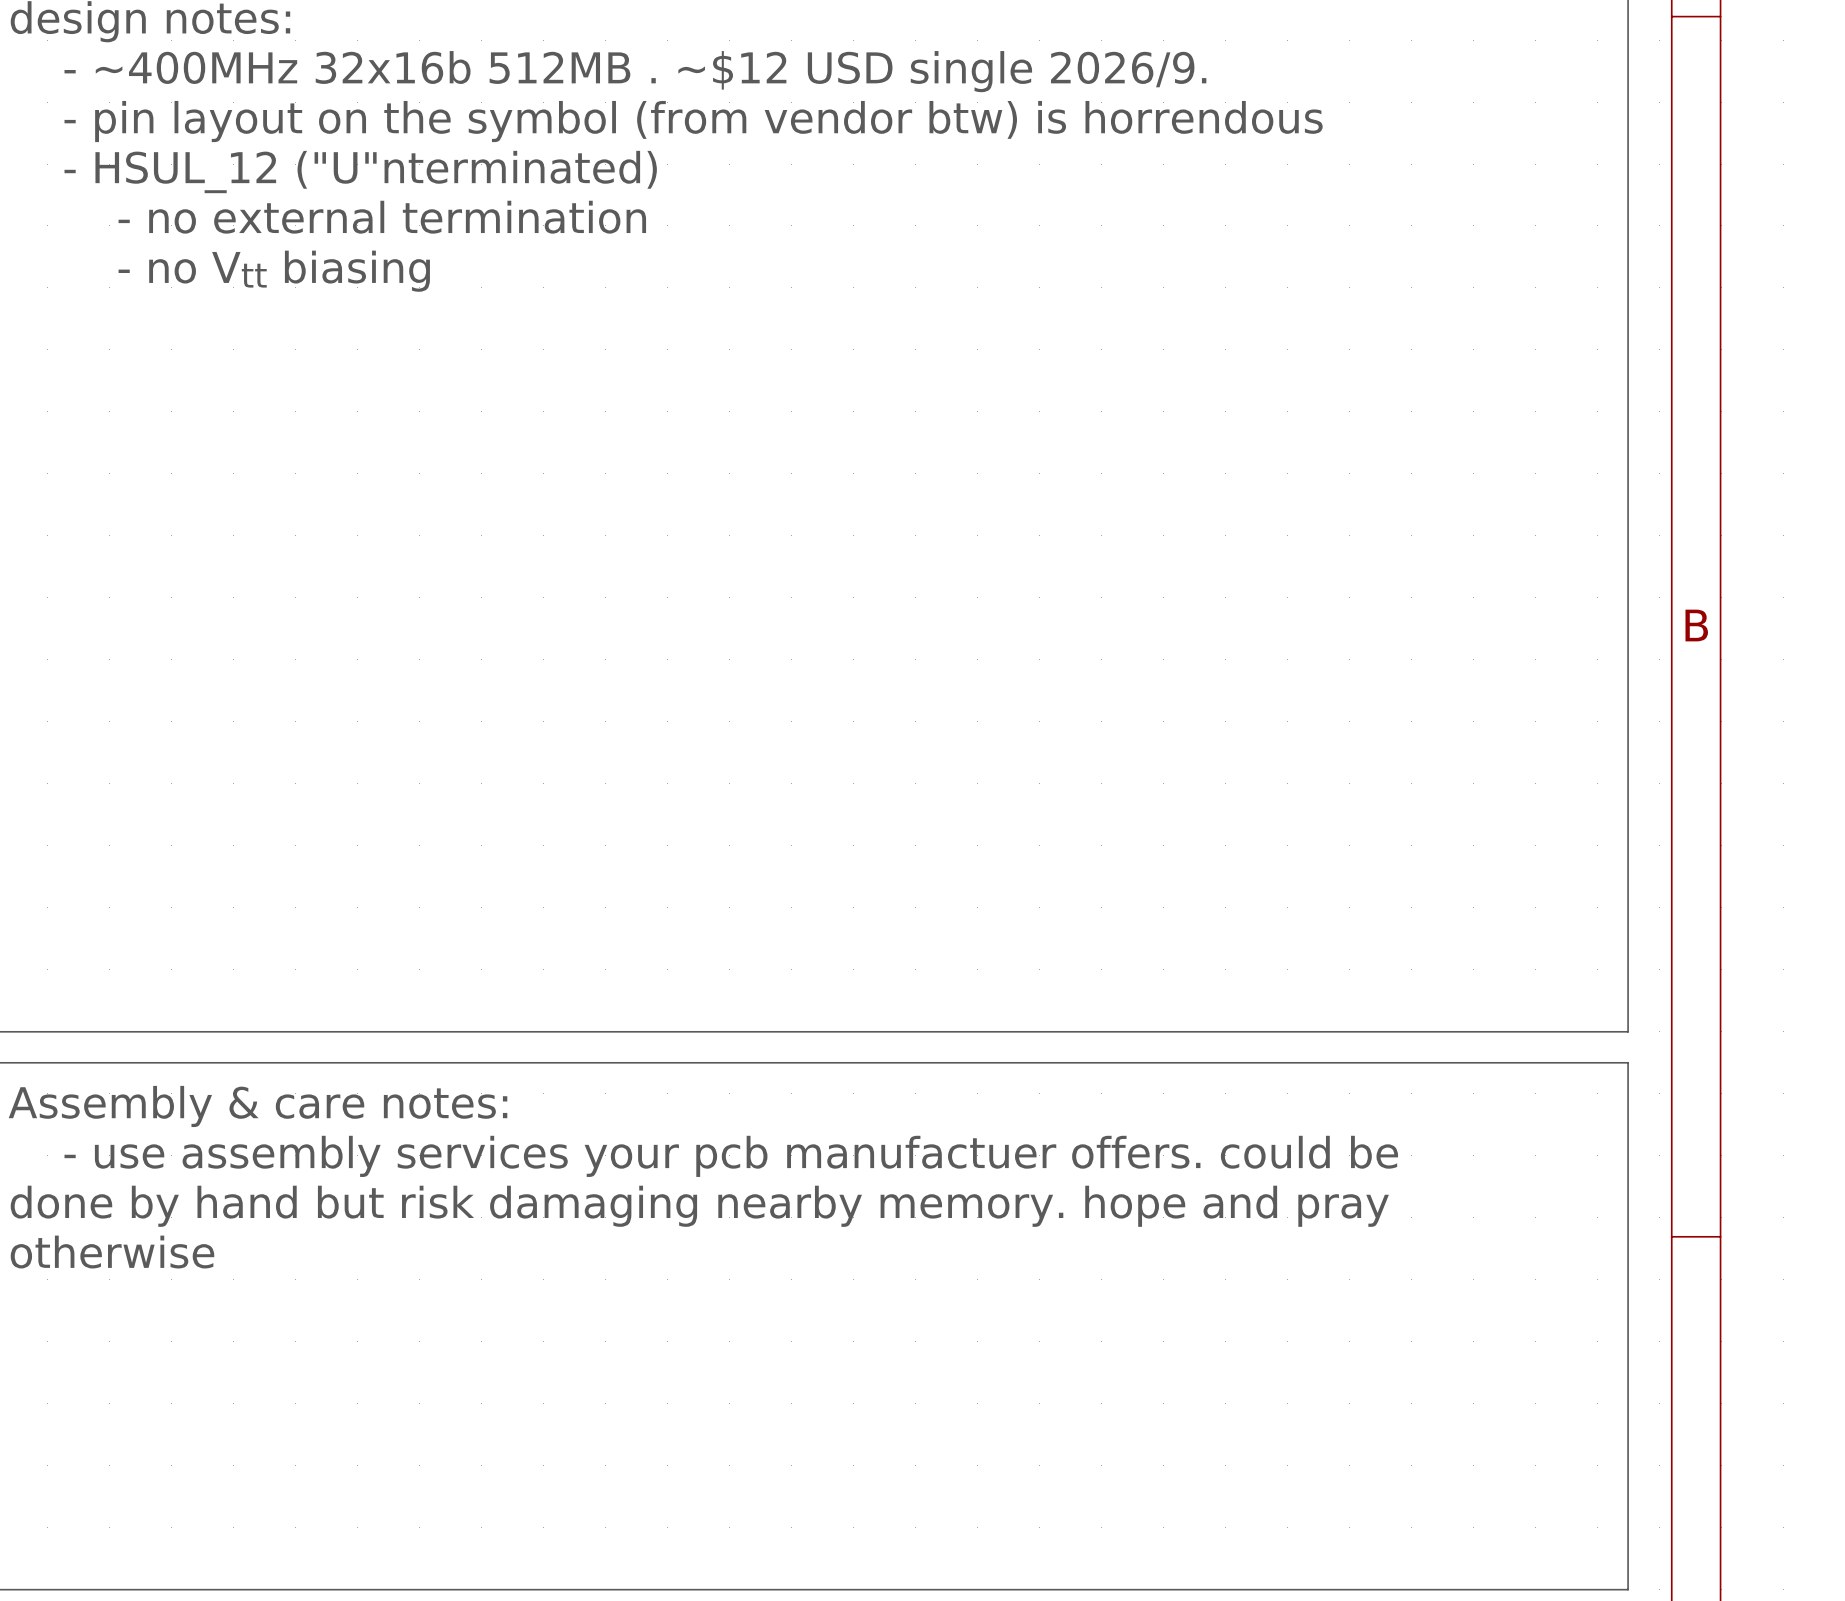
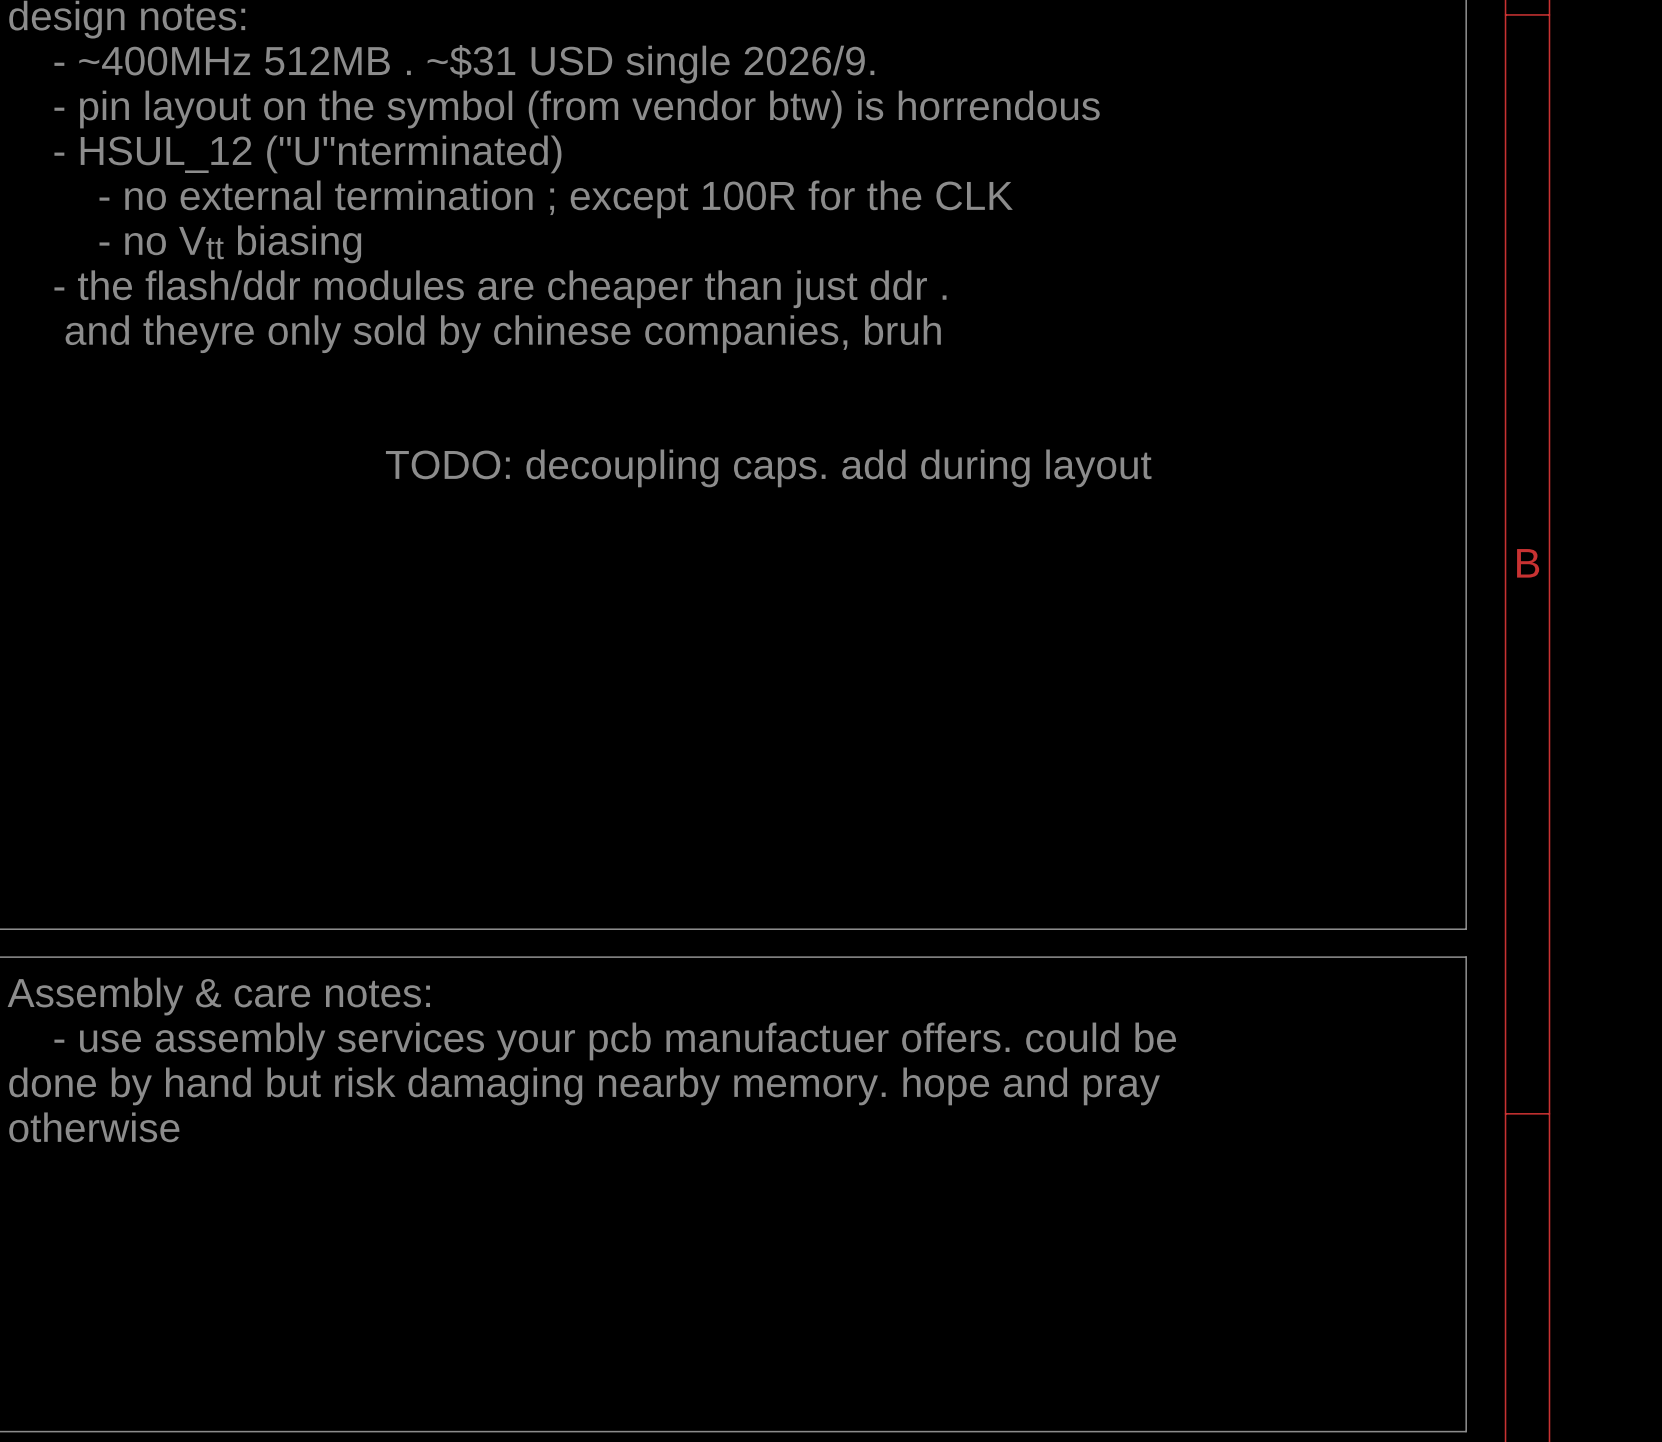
text: - ~400MHz 32x16b 512MB . ~$12 USD single 2026/9. (635, 71) -> - ~400MHz 512MB . ~$31 USD single 2026/9. (464, 64)
text: - no external termination (382, 217) -> - no external termination ; except 100R for the CLK (556, 199)
text: none -> - the flash/ddr modules are cheaper than just ddr . (500, 289)
text: none -> and theyre only sold by chinese companies, bruh (503, 334)
text: none -> TODO: decoupling caps. add during layout (768, 468)

